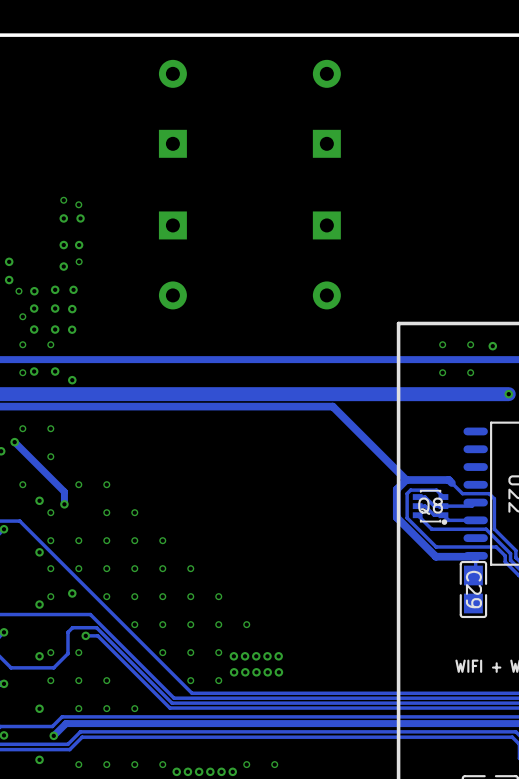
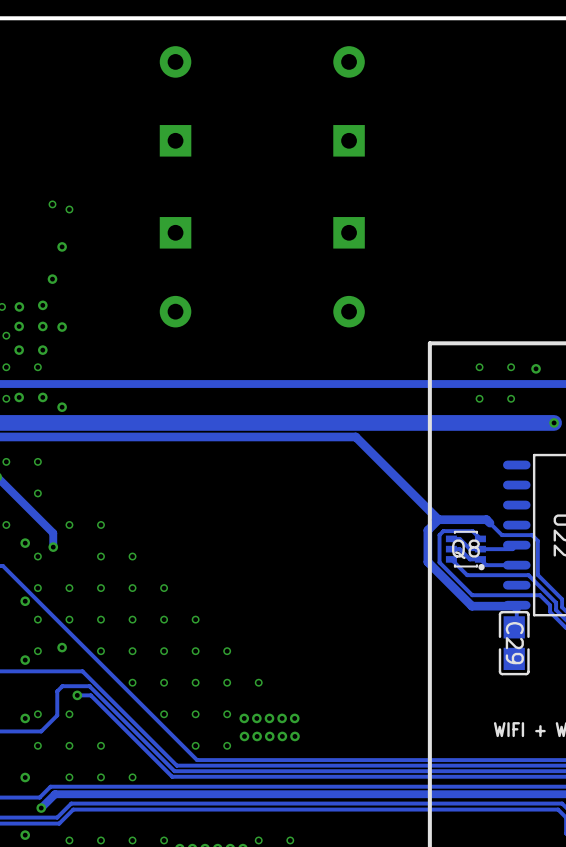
via: (63, 218) -> none
via: (80, 218) -> none
via: none -> (62, 246)
via: (63, 245) -> none
via: (79, 245) -> none
via: (79, 261) -> none
via: (73, 289) -> none
via: (72, 329) -> none

